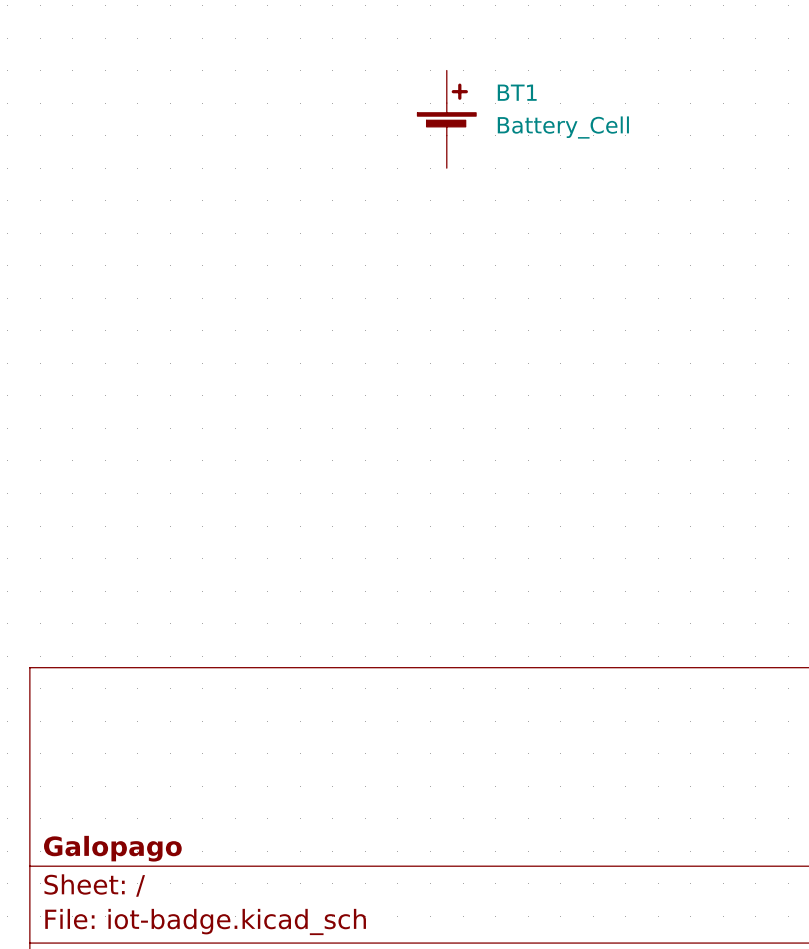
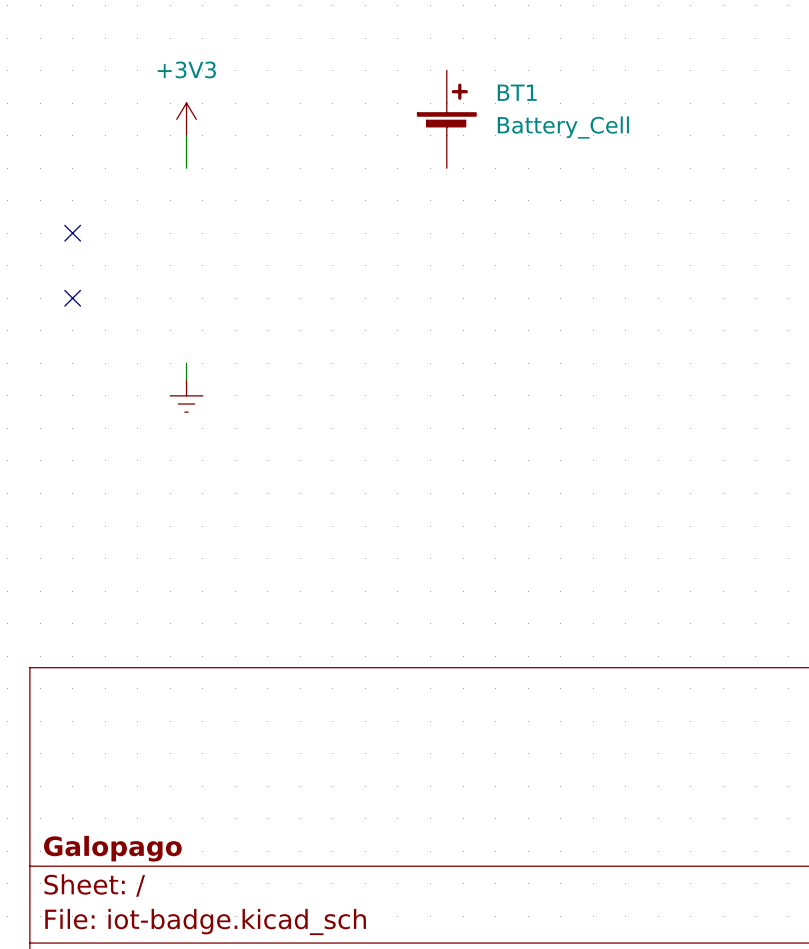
power symbol: none -> +3V3 (186, 119)
wire: none -> (186, 135) (186, 168)
no-connect mark: none -> (72, 233)
no-connect mark: none -> (72, 298)
wire: none -> (186, 363) (186, 379)
power symbol: none -> (186, 395)

